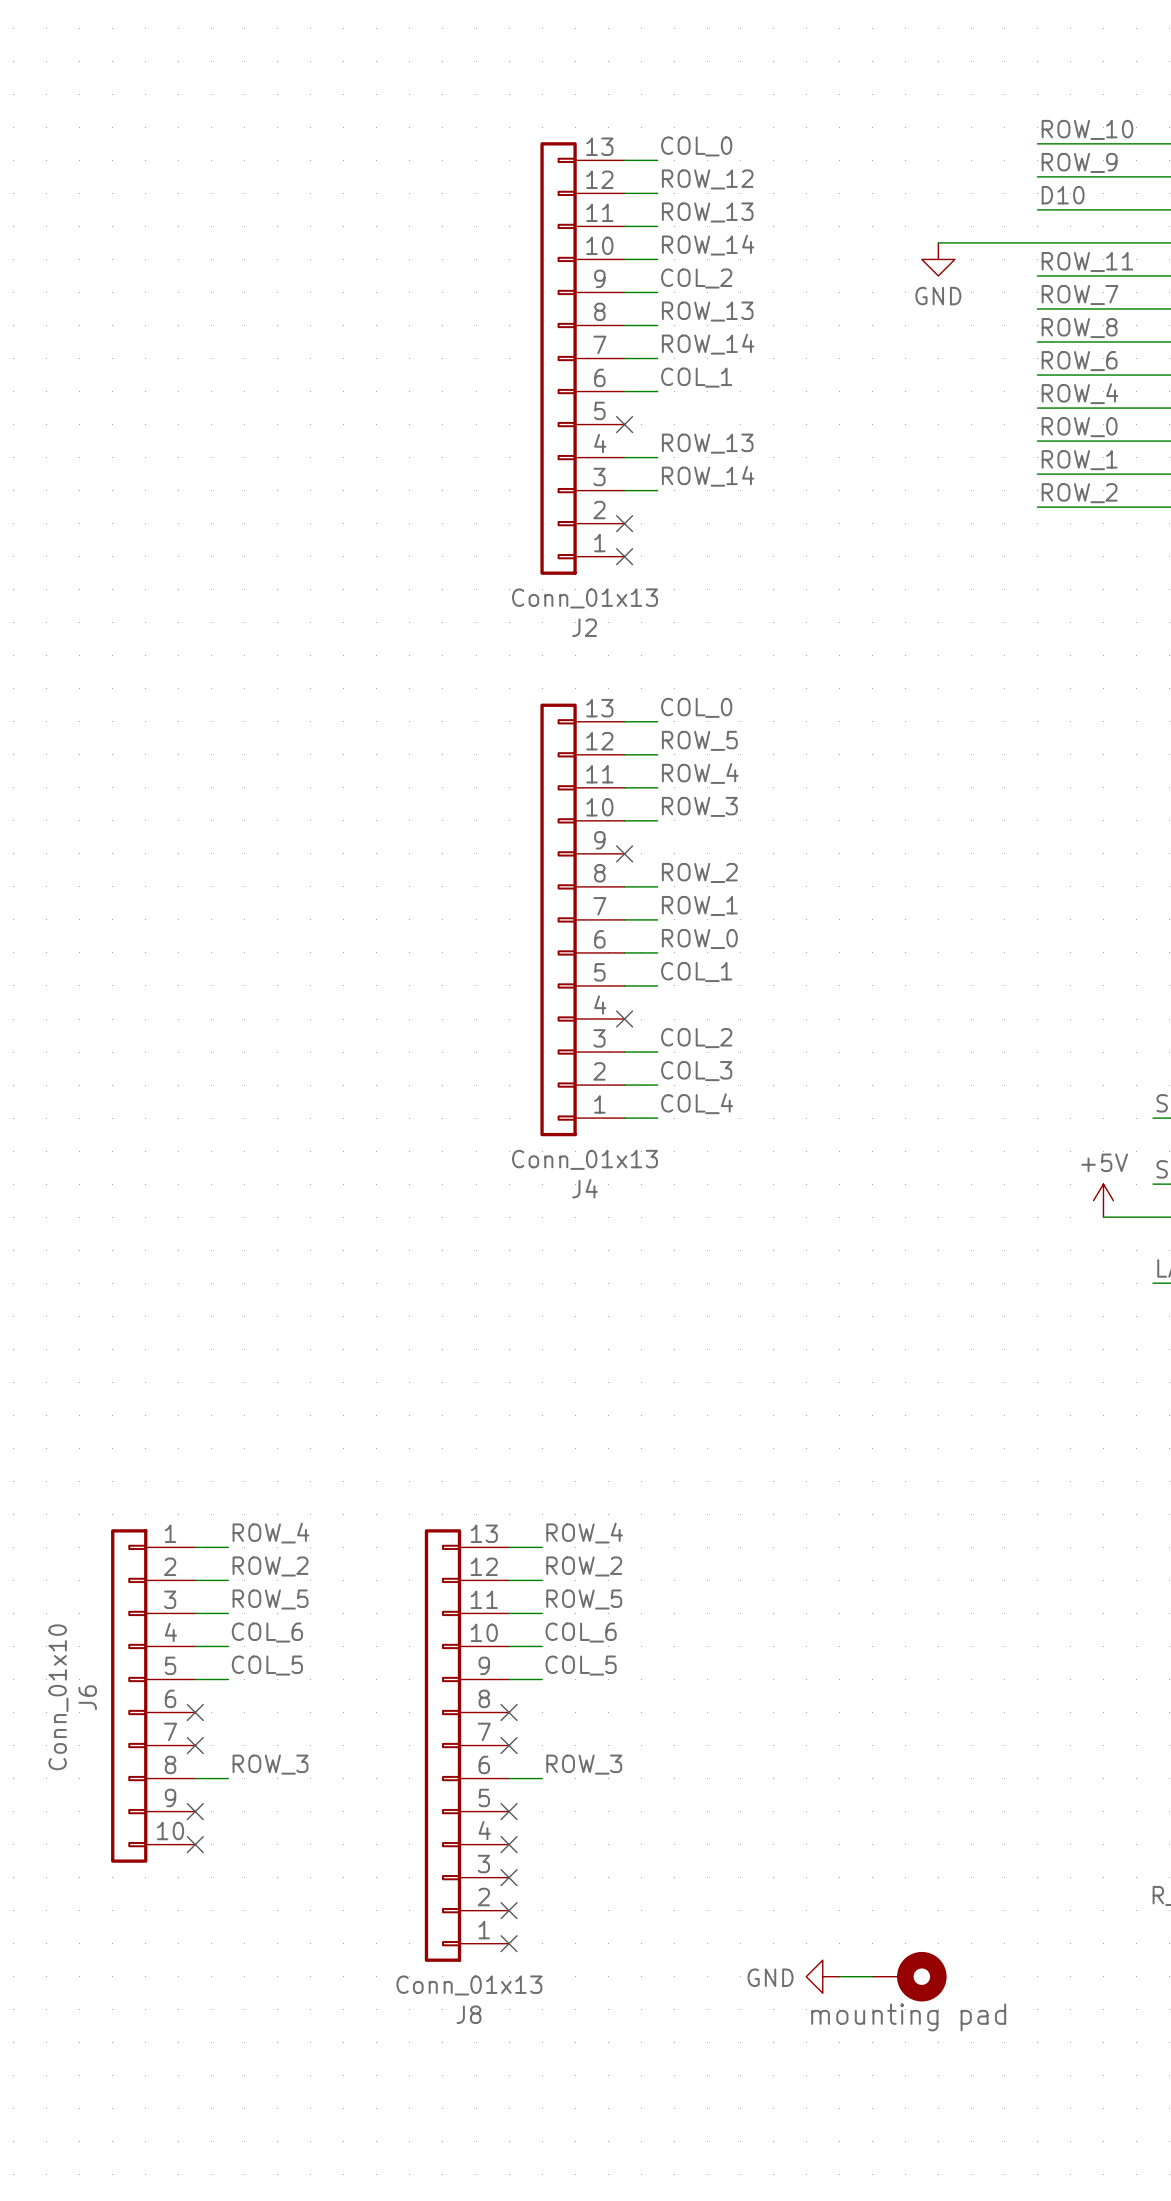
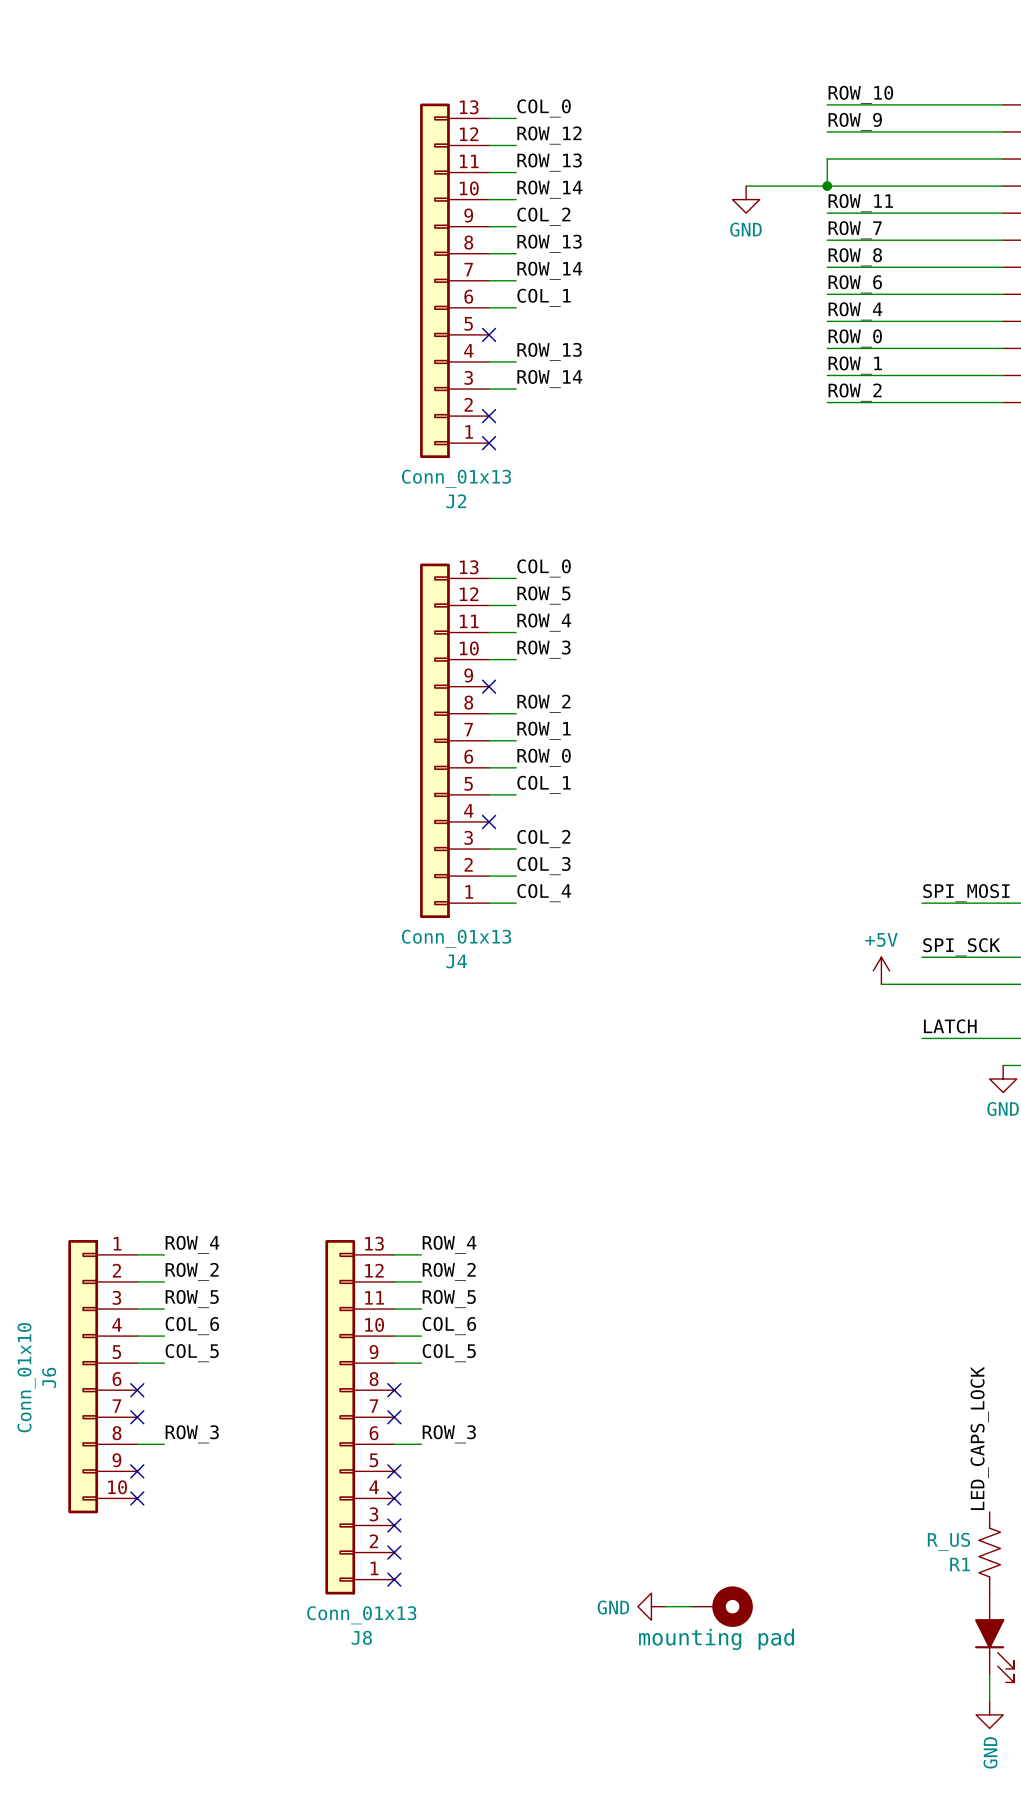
label: D10 (1063, 195) -> none
wire: none -> (827, 159) (827, 186)
junction: none -> (827, 186)

